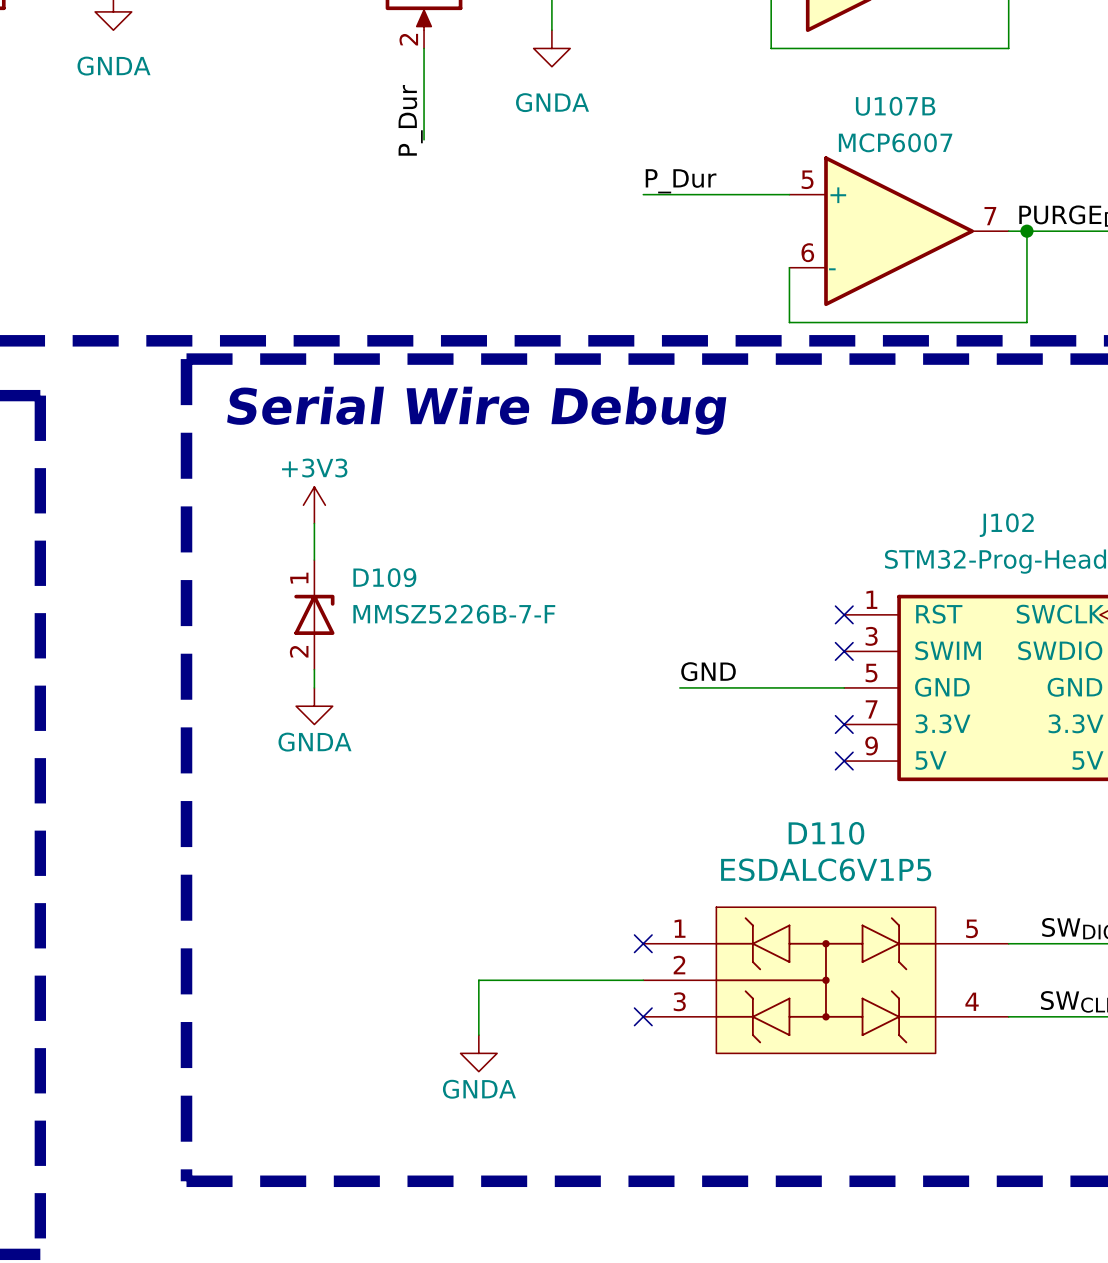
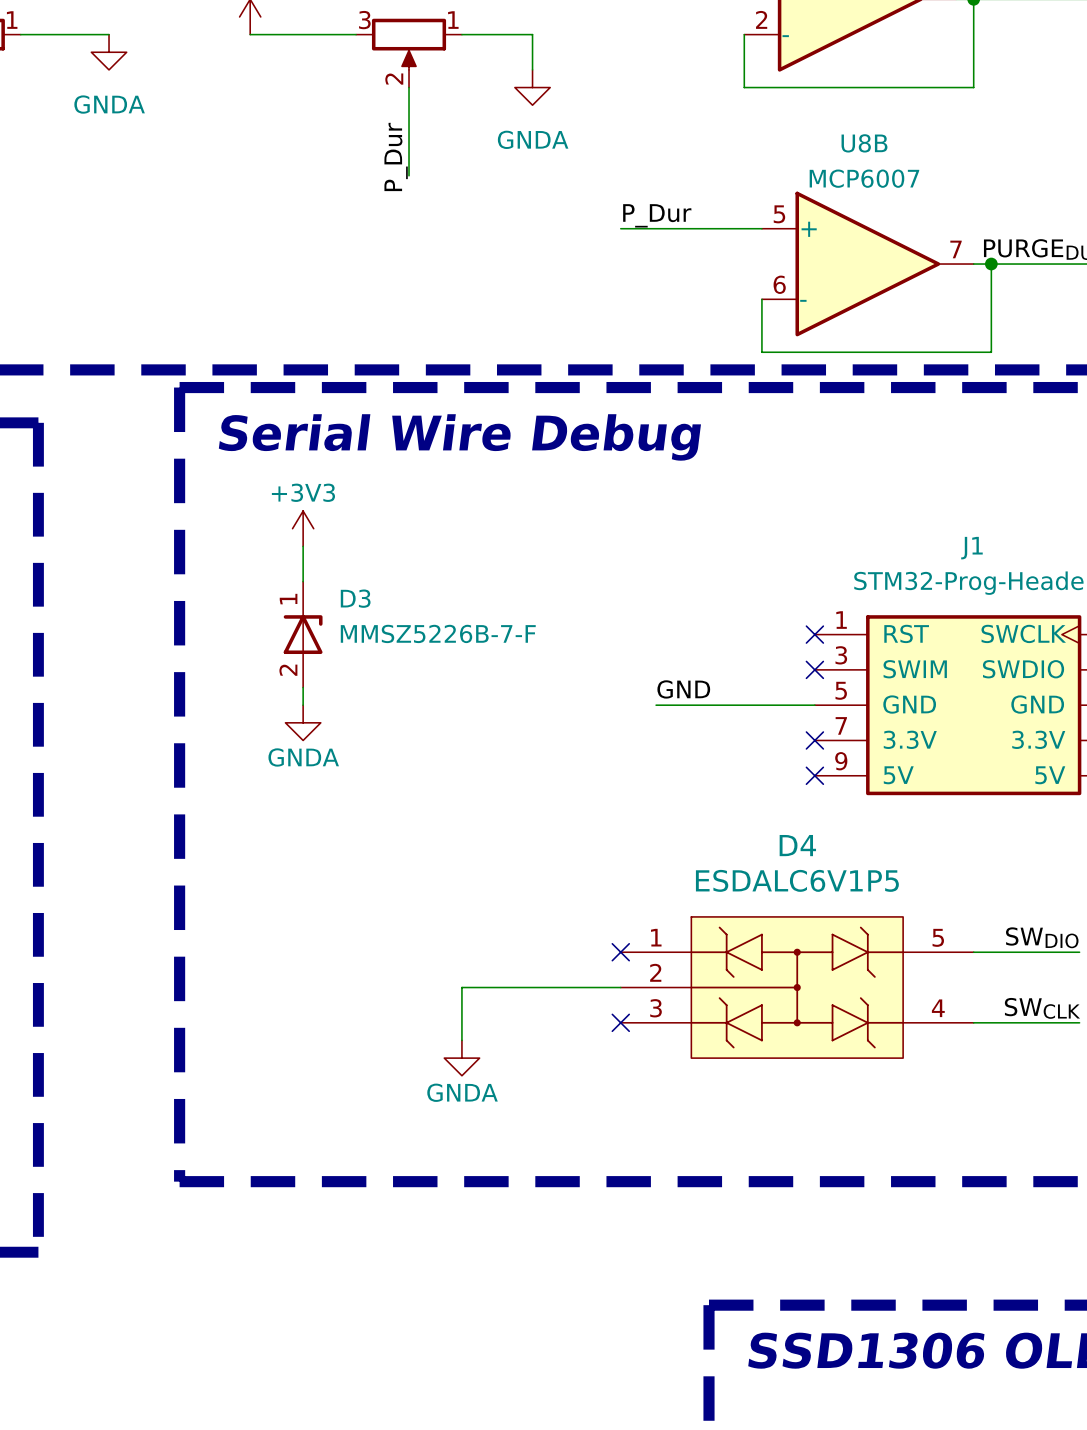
U107B name: U107B (895, 106) -> U8B (864, 143)
J102 name: J102 (1006, 525) -> J1 (971, 548)
D109 name: D109 (384, 577) -> D3 (355, 598)
D110 name: D110 (826, 833) -> D4 (797, 845)

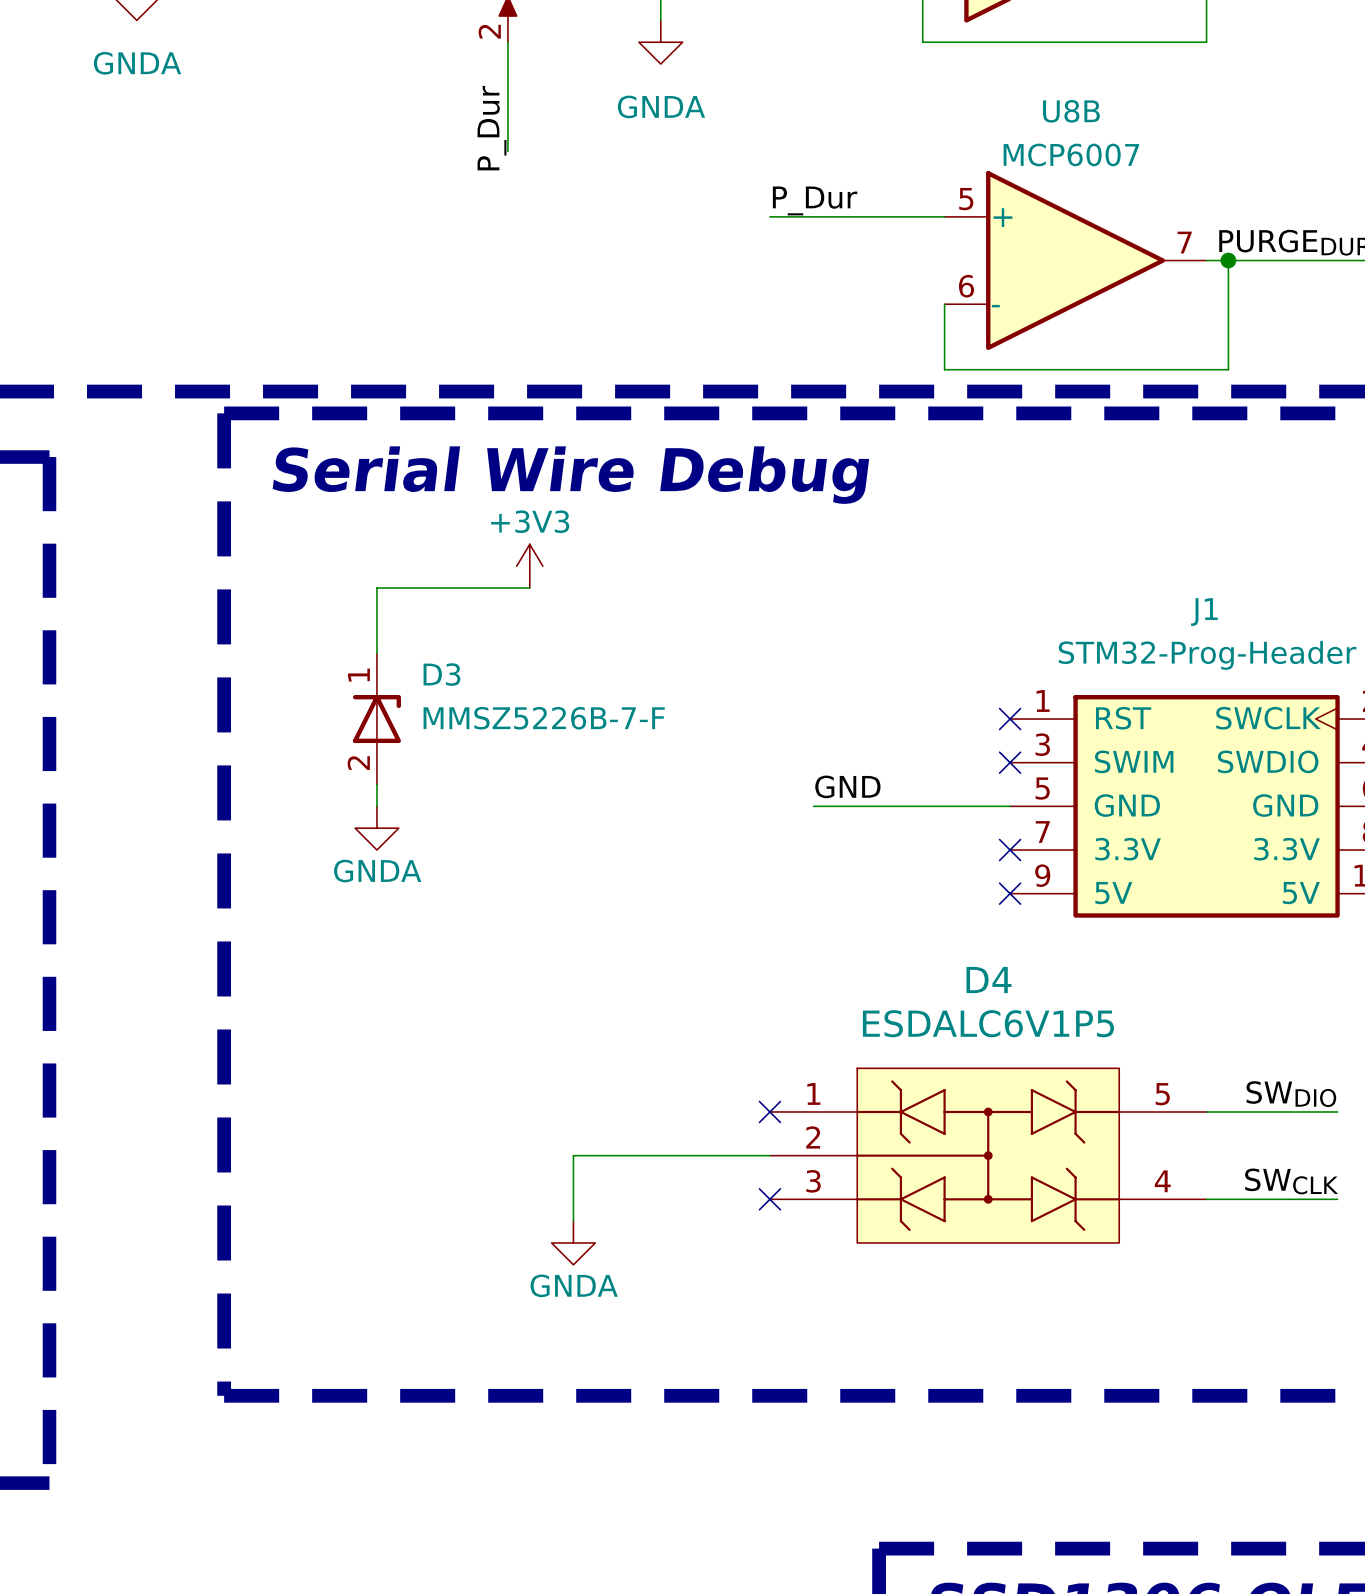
power symbol position: +3V3 (303, 528) -> +3V3 (529, 566)
wire: none -> (529, 588) (376, 588) (376, 609)

